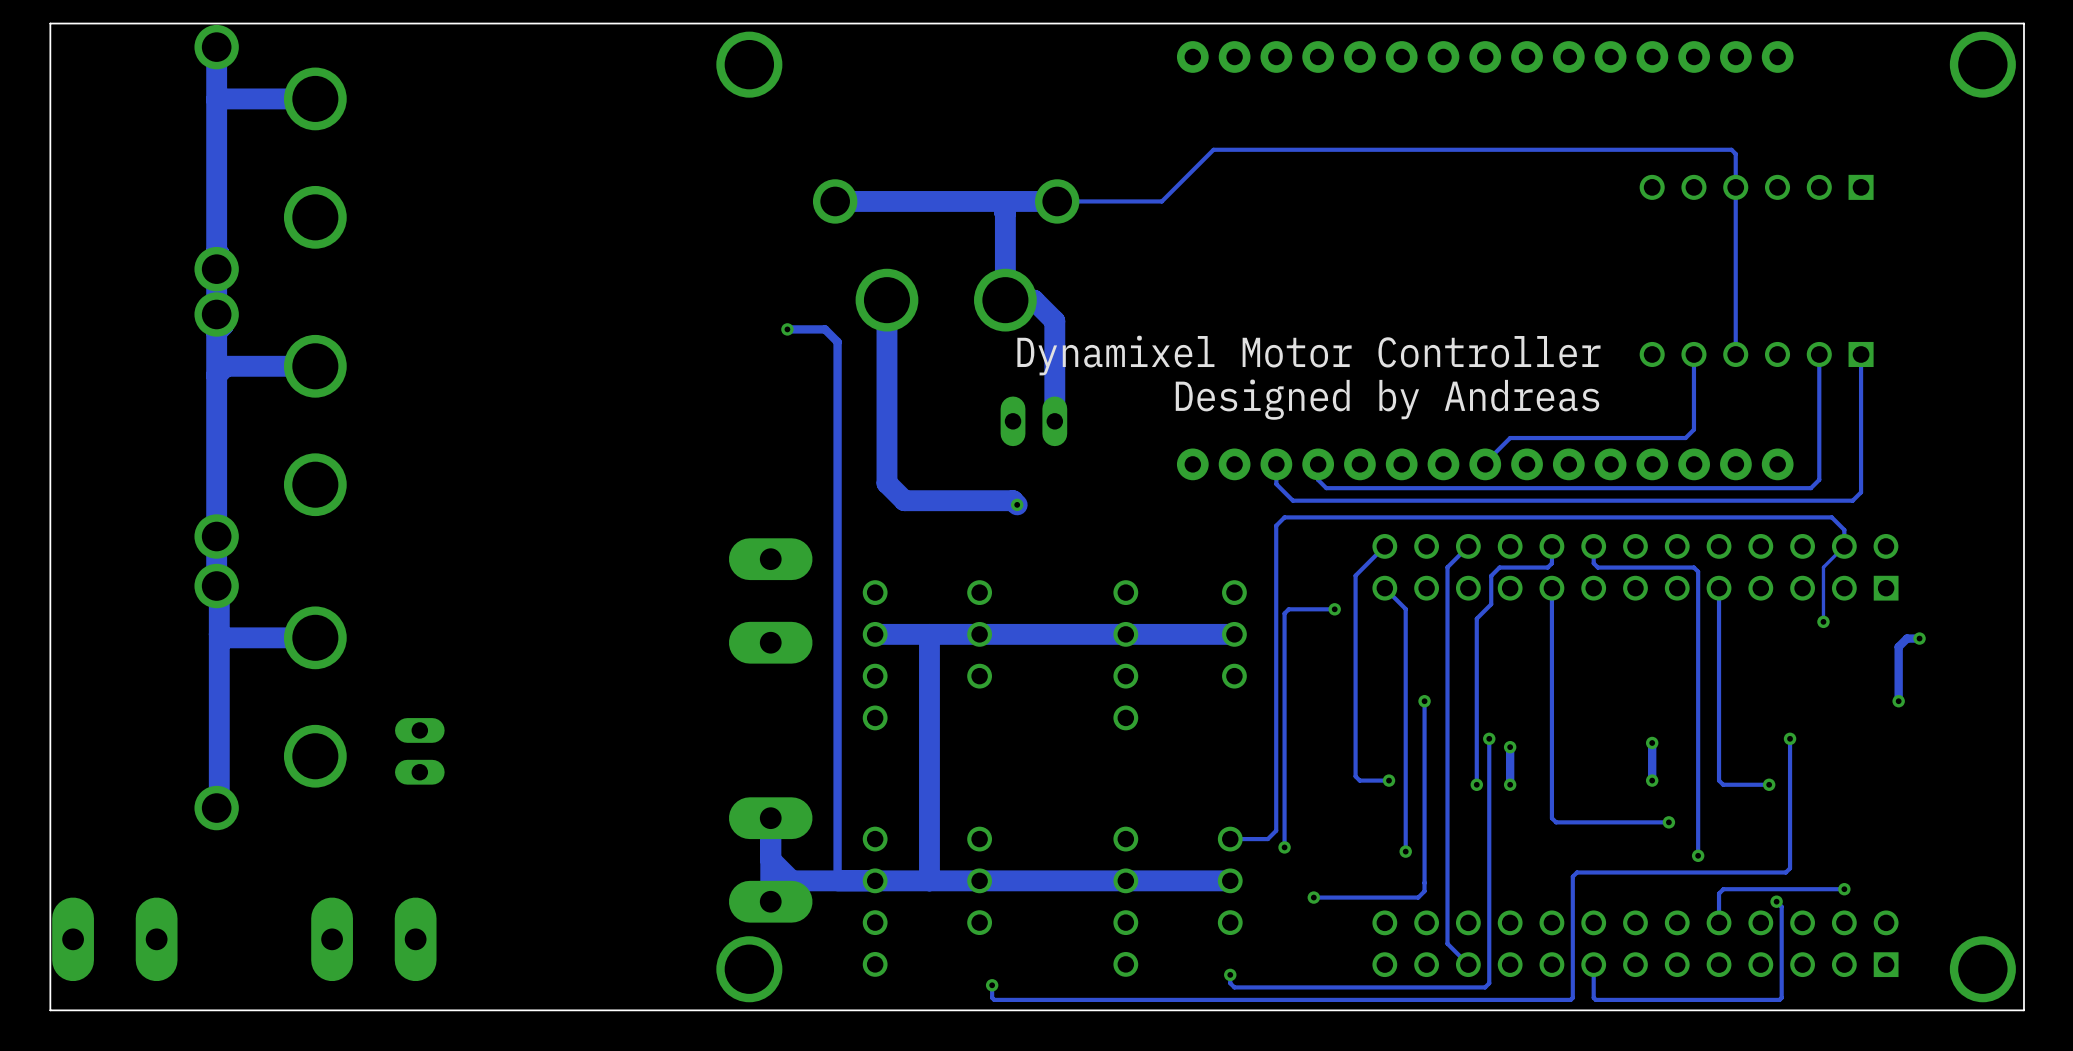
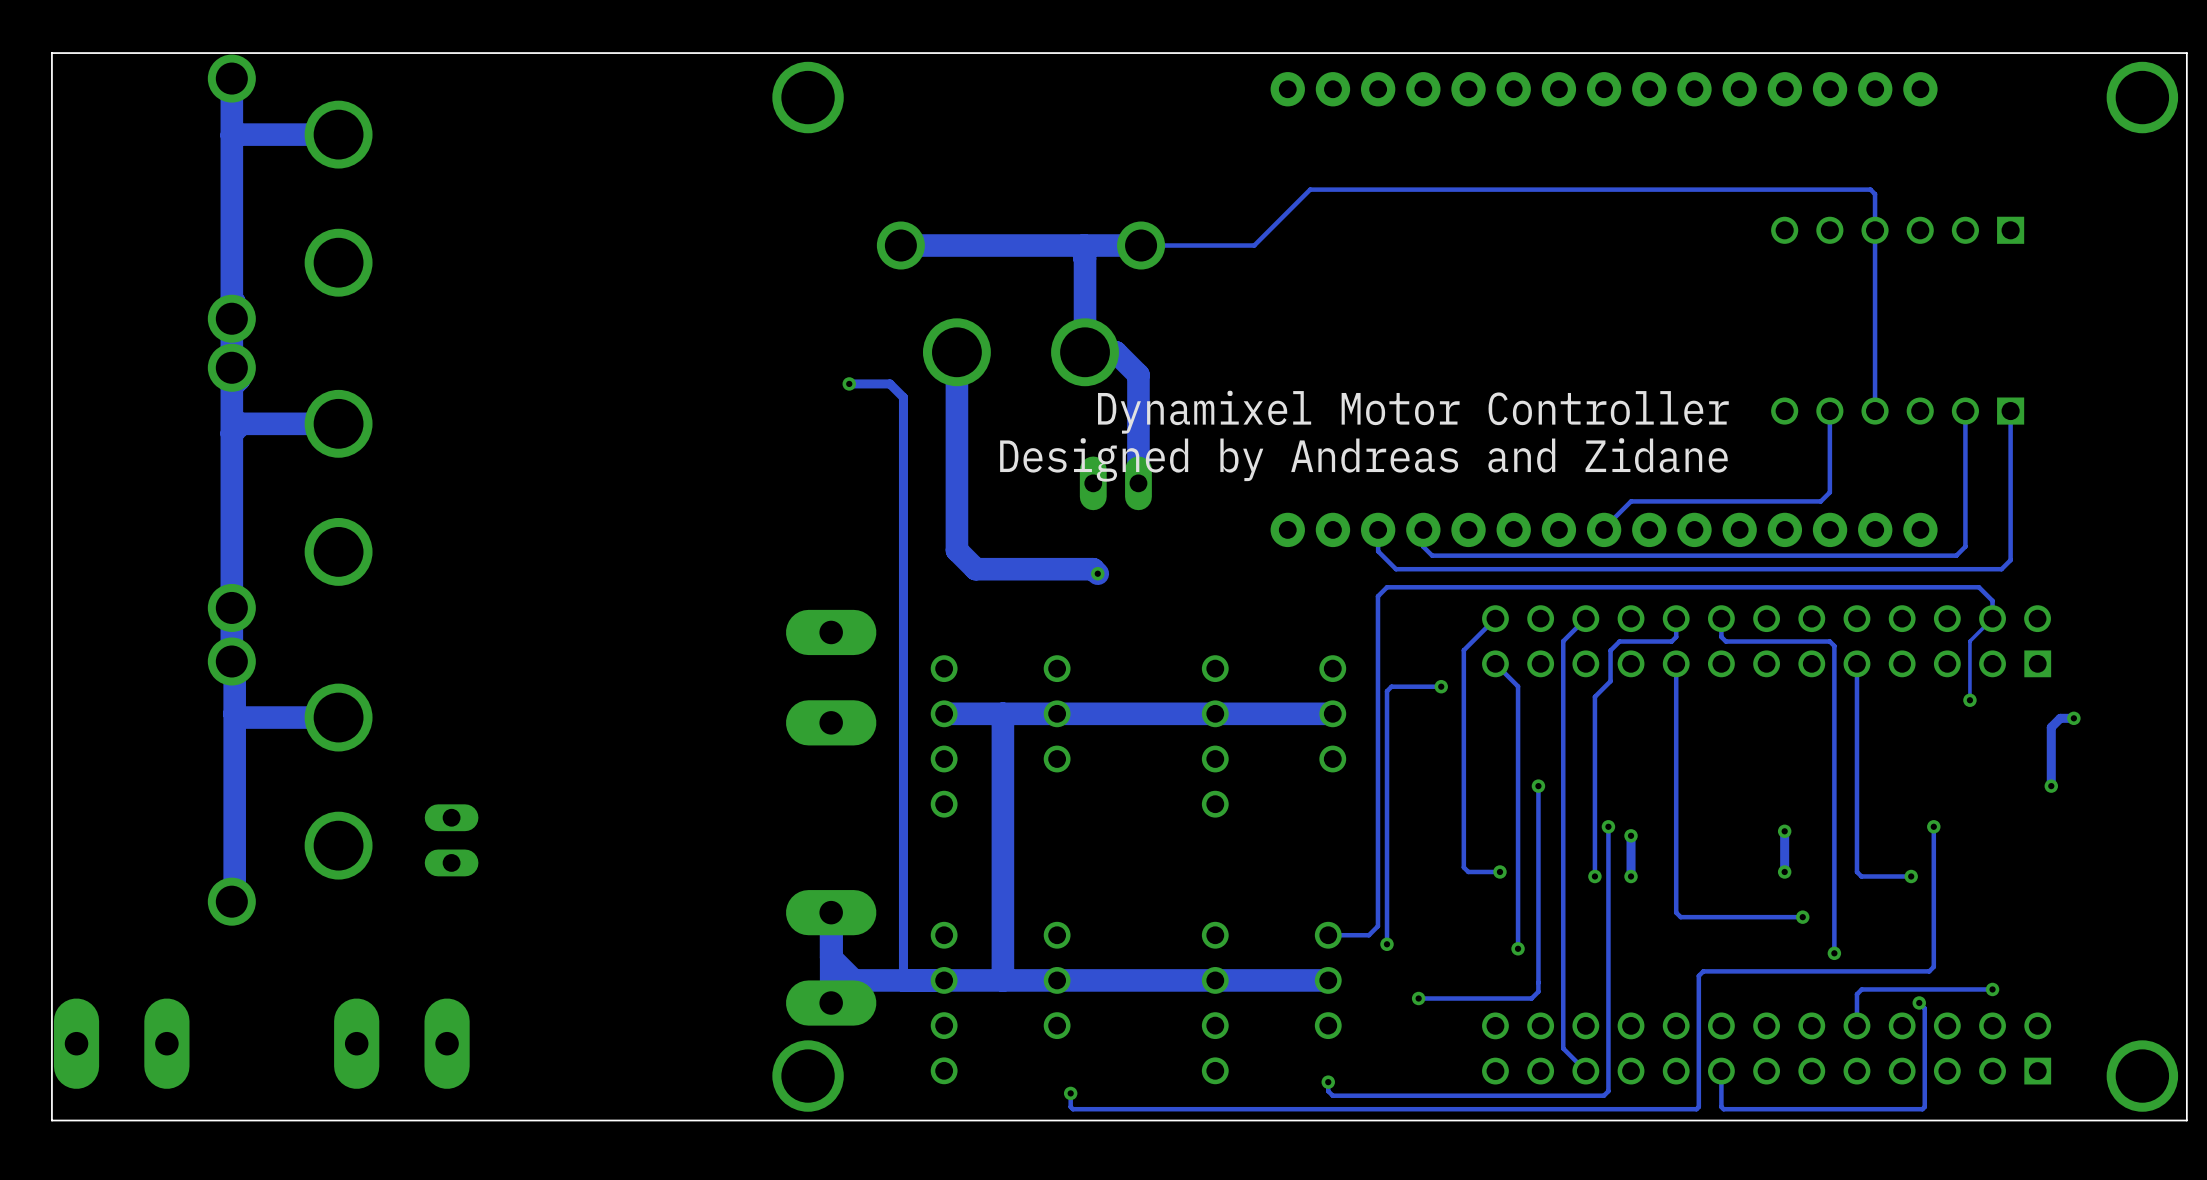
text: Designed by Andreas (1387, 399) -> Designed by Andreas and Zidane (1363, 459)

